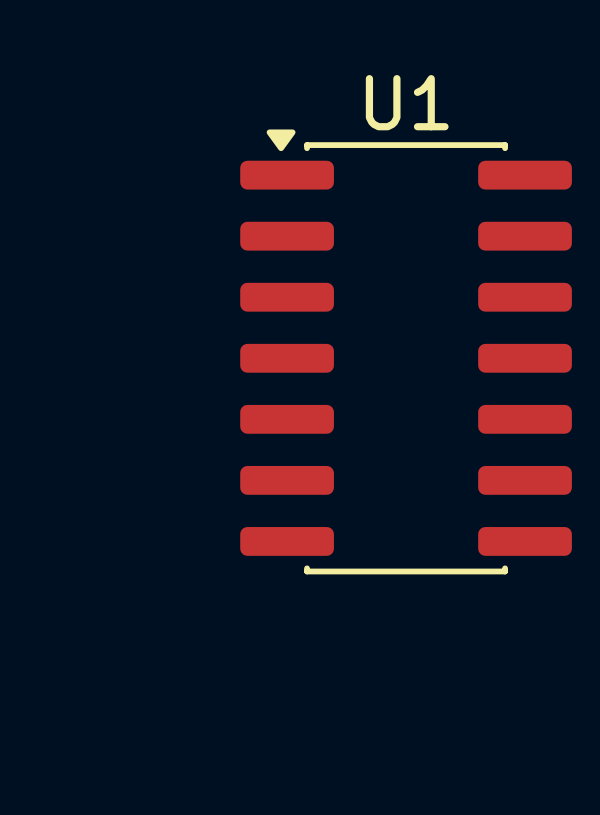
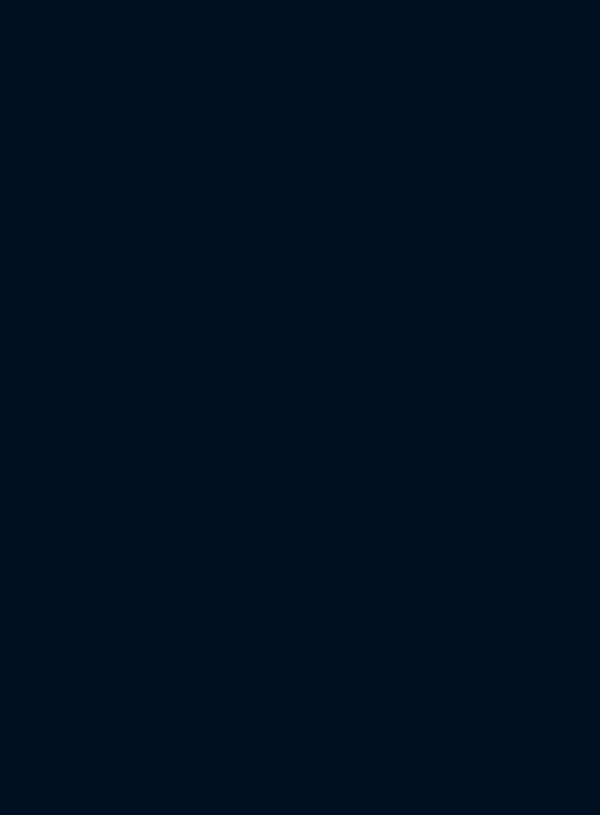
U1: (406, 351) -> none

